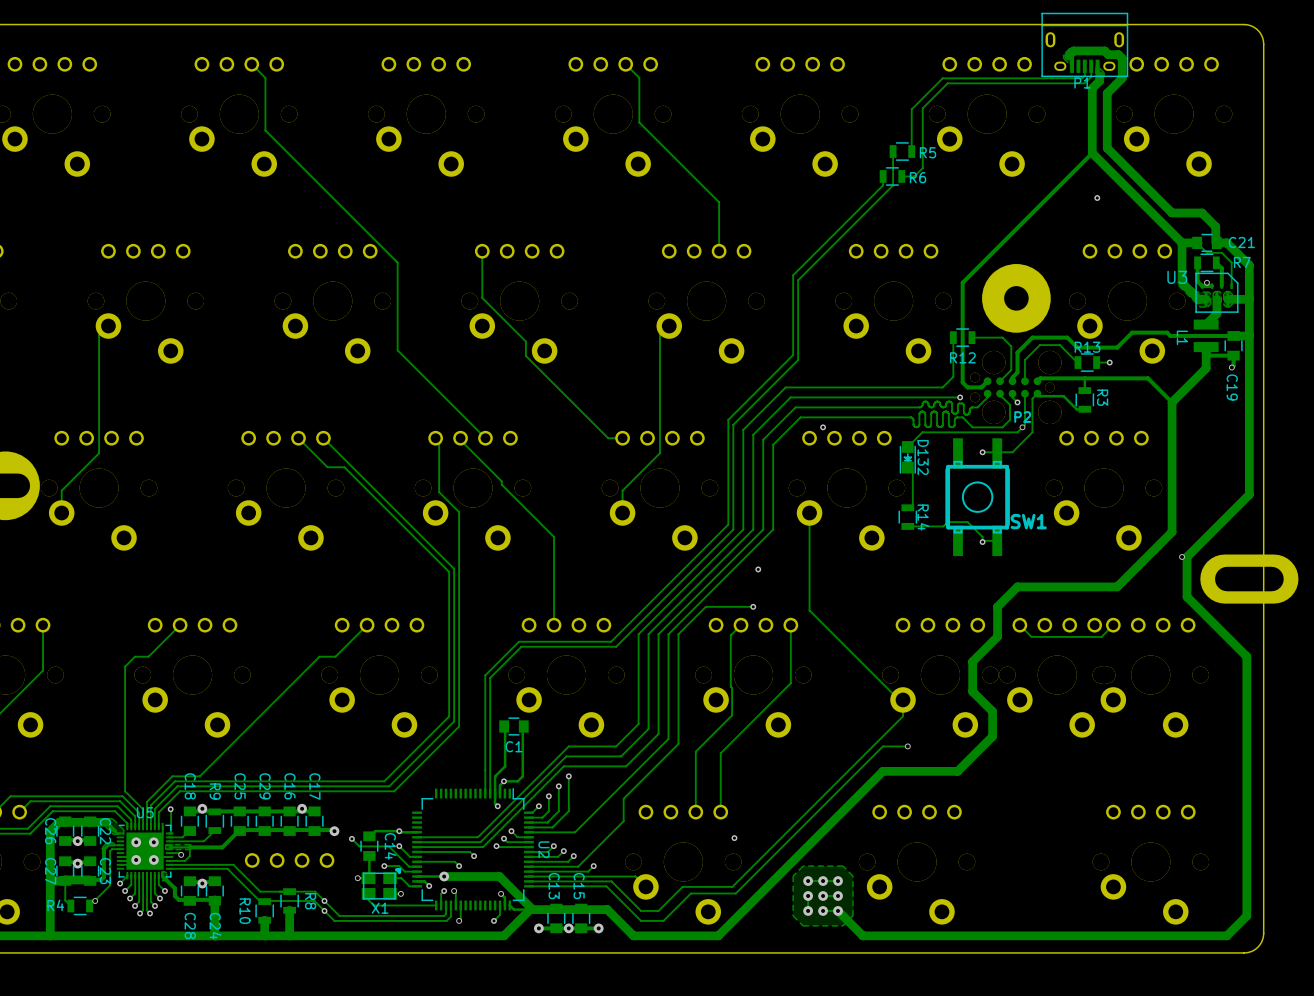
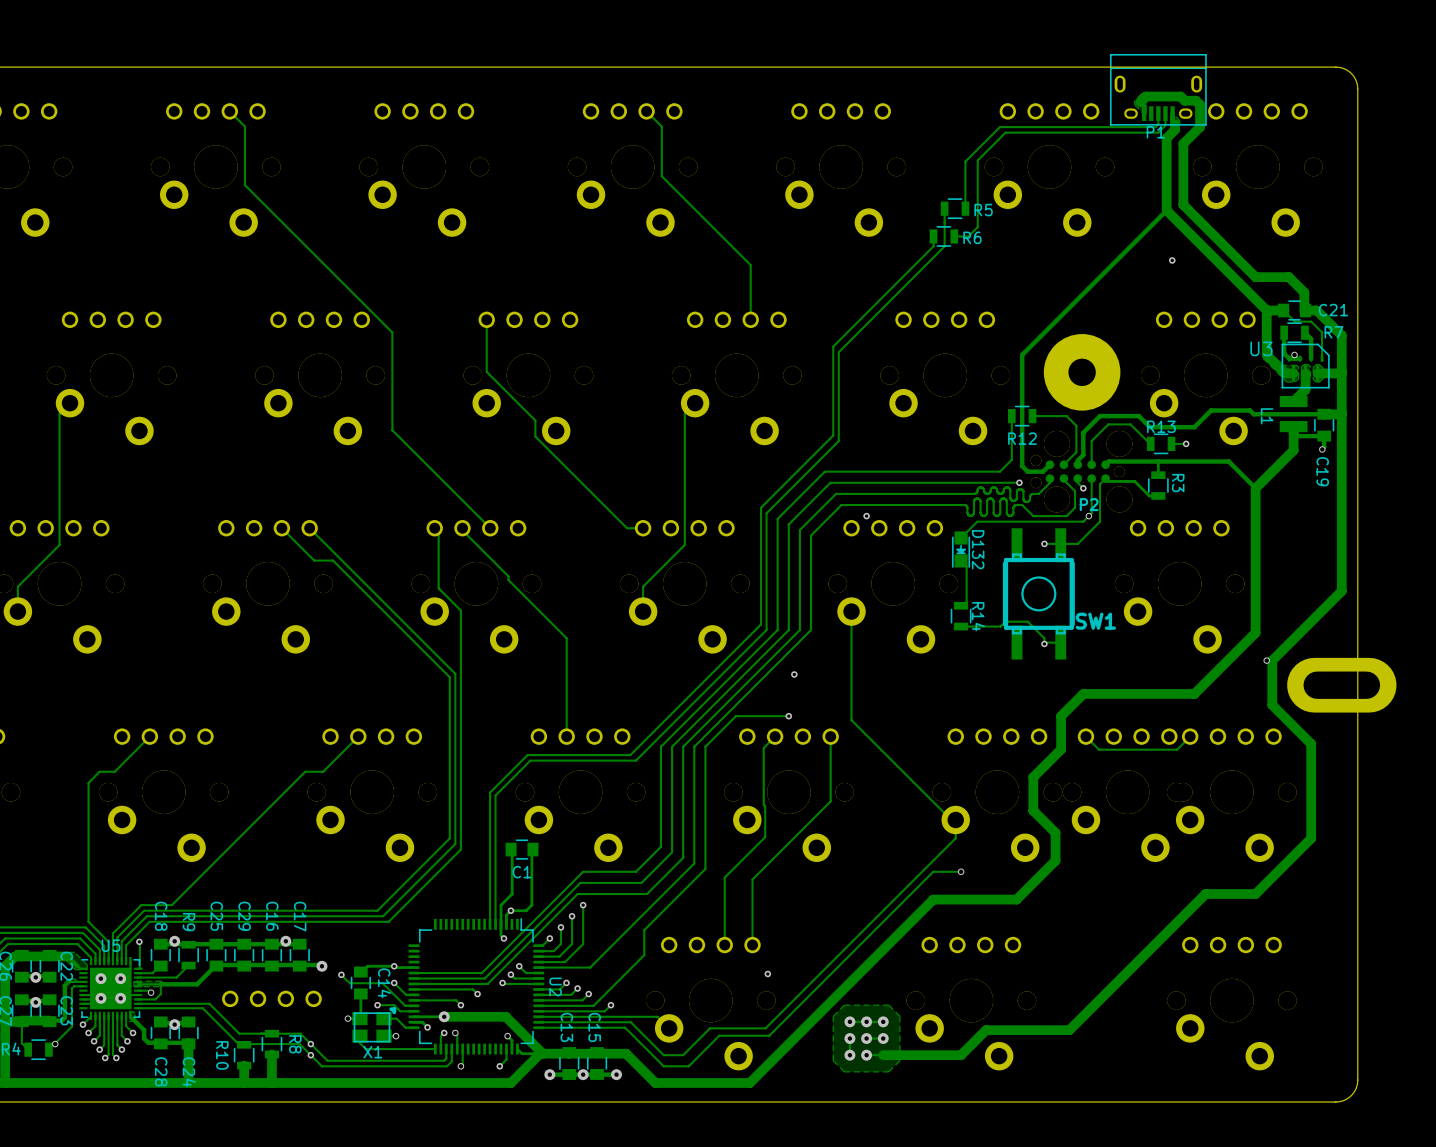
track: (1221, 631) (1246, 656) (1246, 915) (1226, 935) (862, 935) (838, 910) -> (1311, 743) (1311, 838) (1255, 894) (1205, 894) (1069, 1030) (986, 1030) (961, 1055) (883, 1055)
via: (838, 910) -> none

